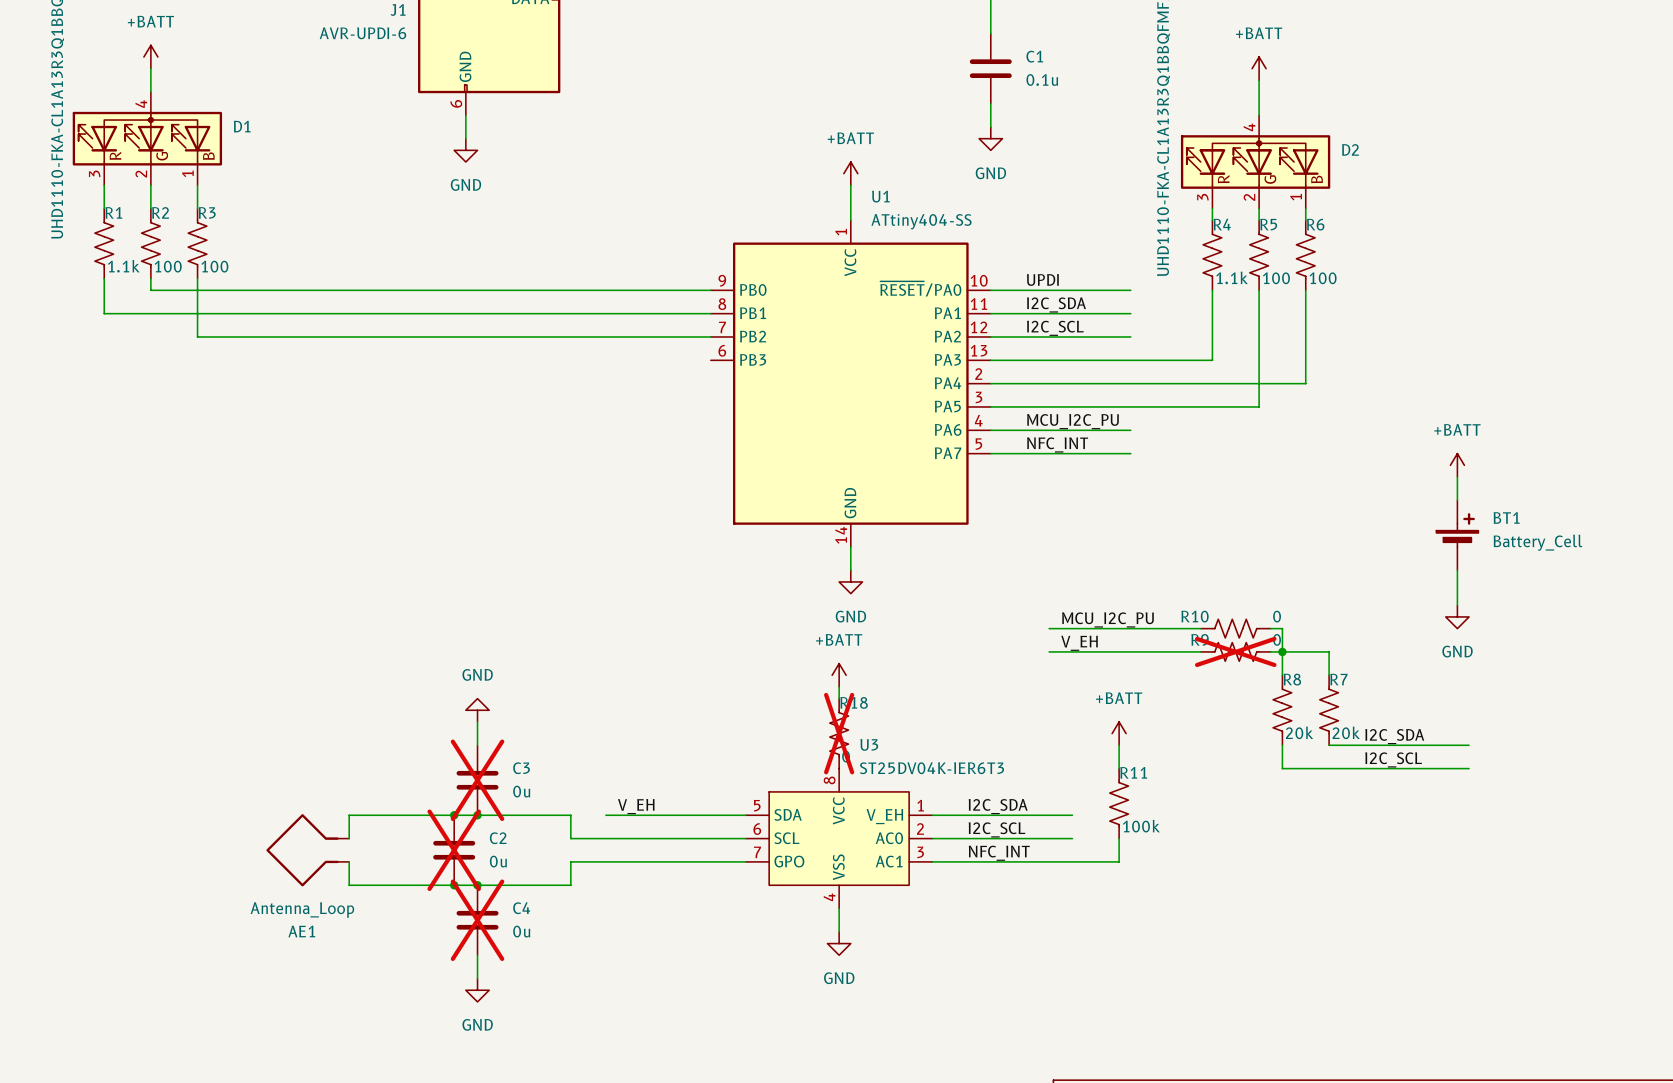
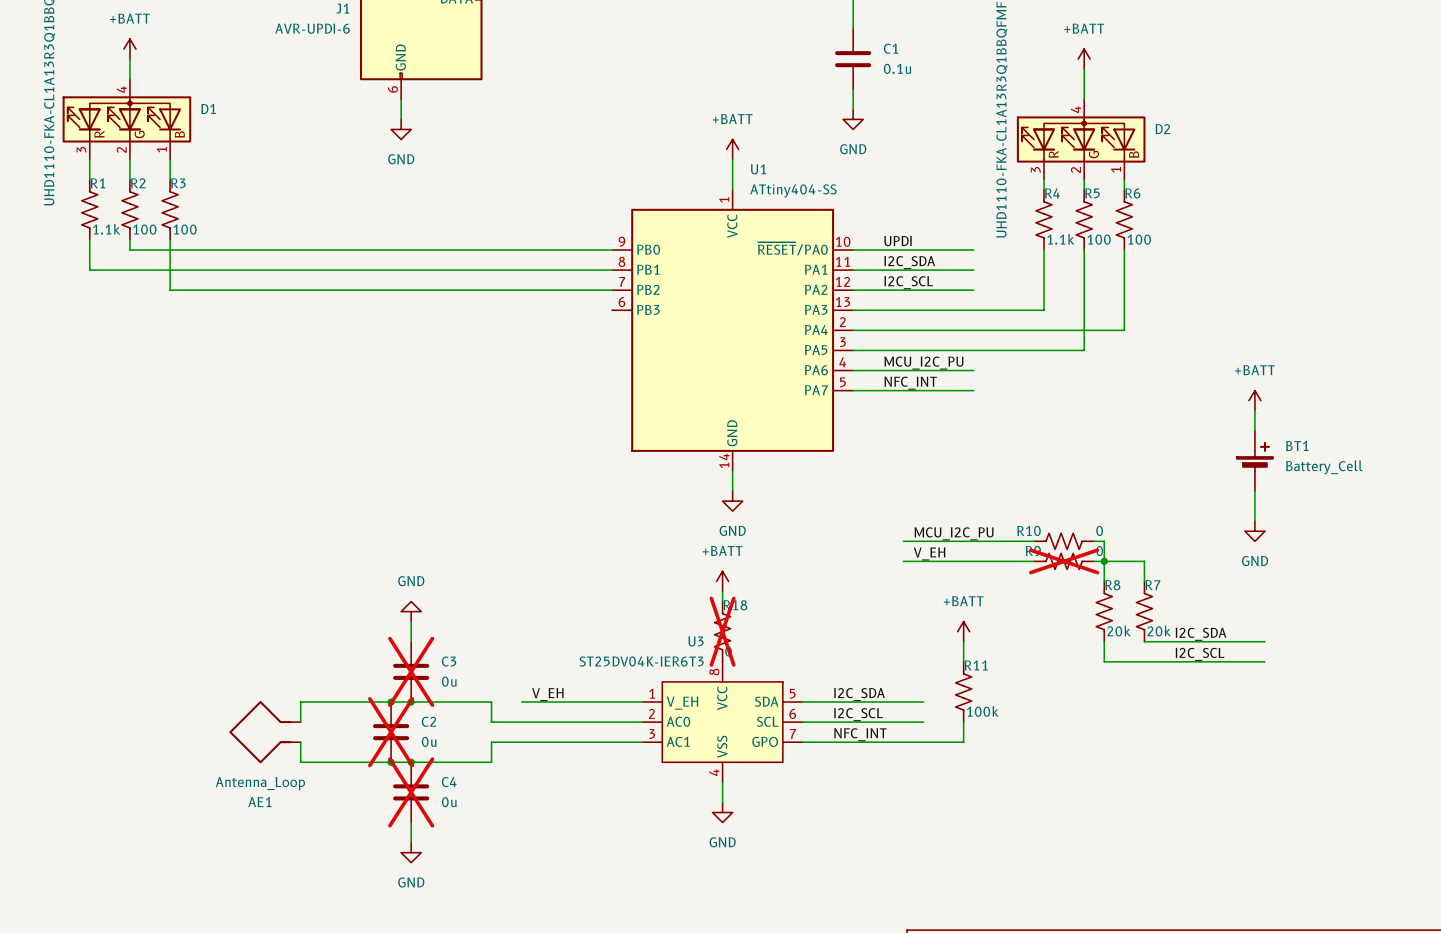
U3 flip: as is (839, 838) -> left-right (722, 722)

